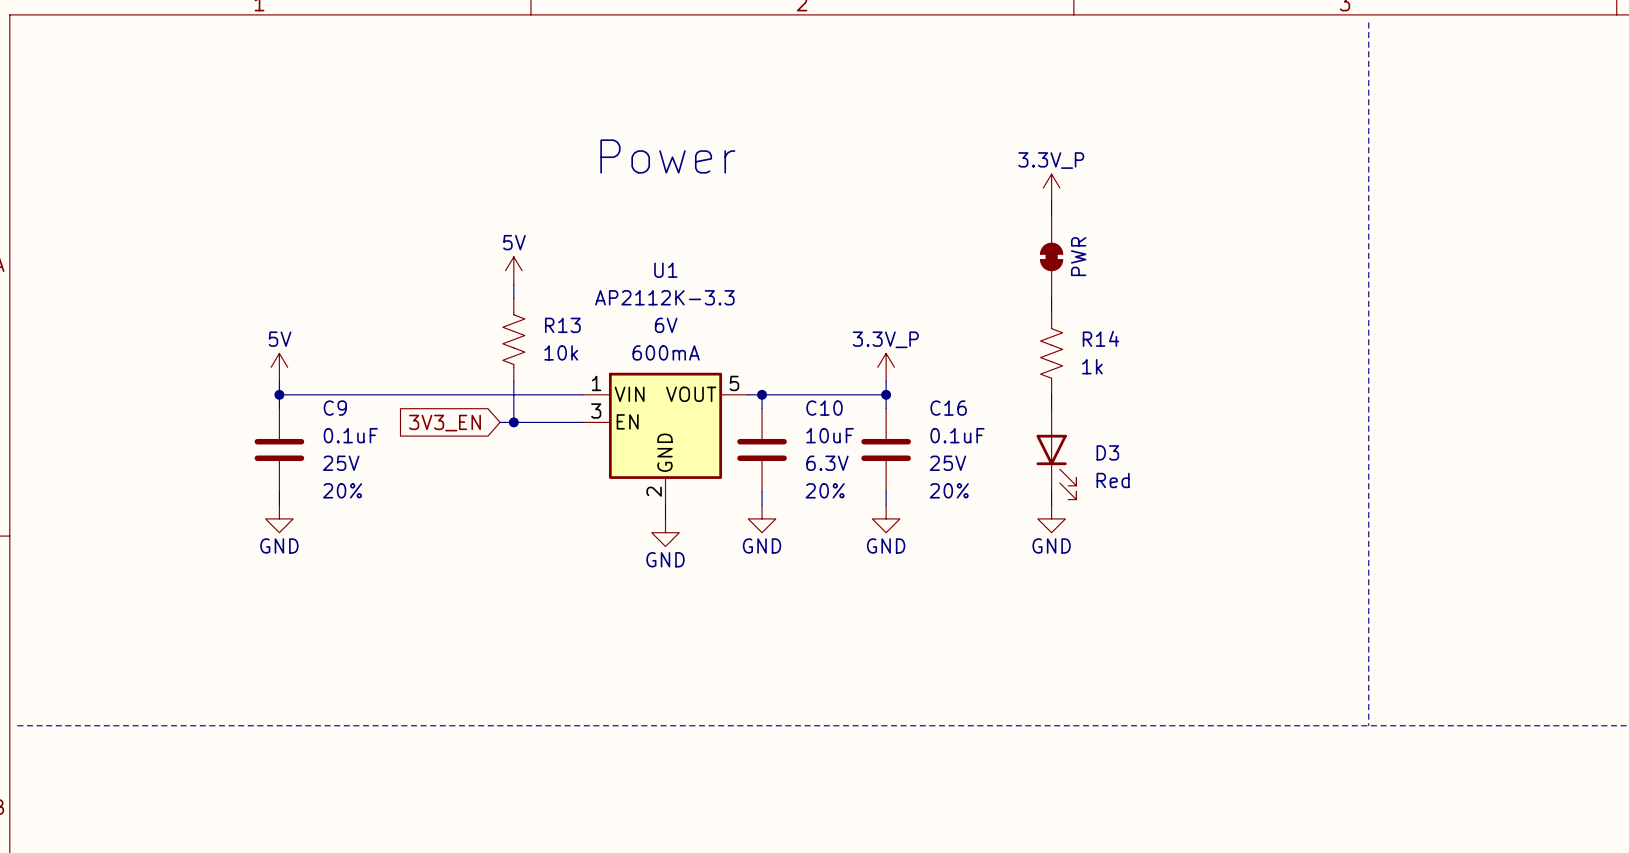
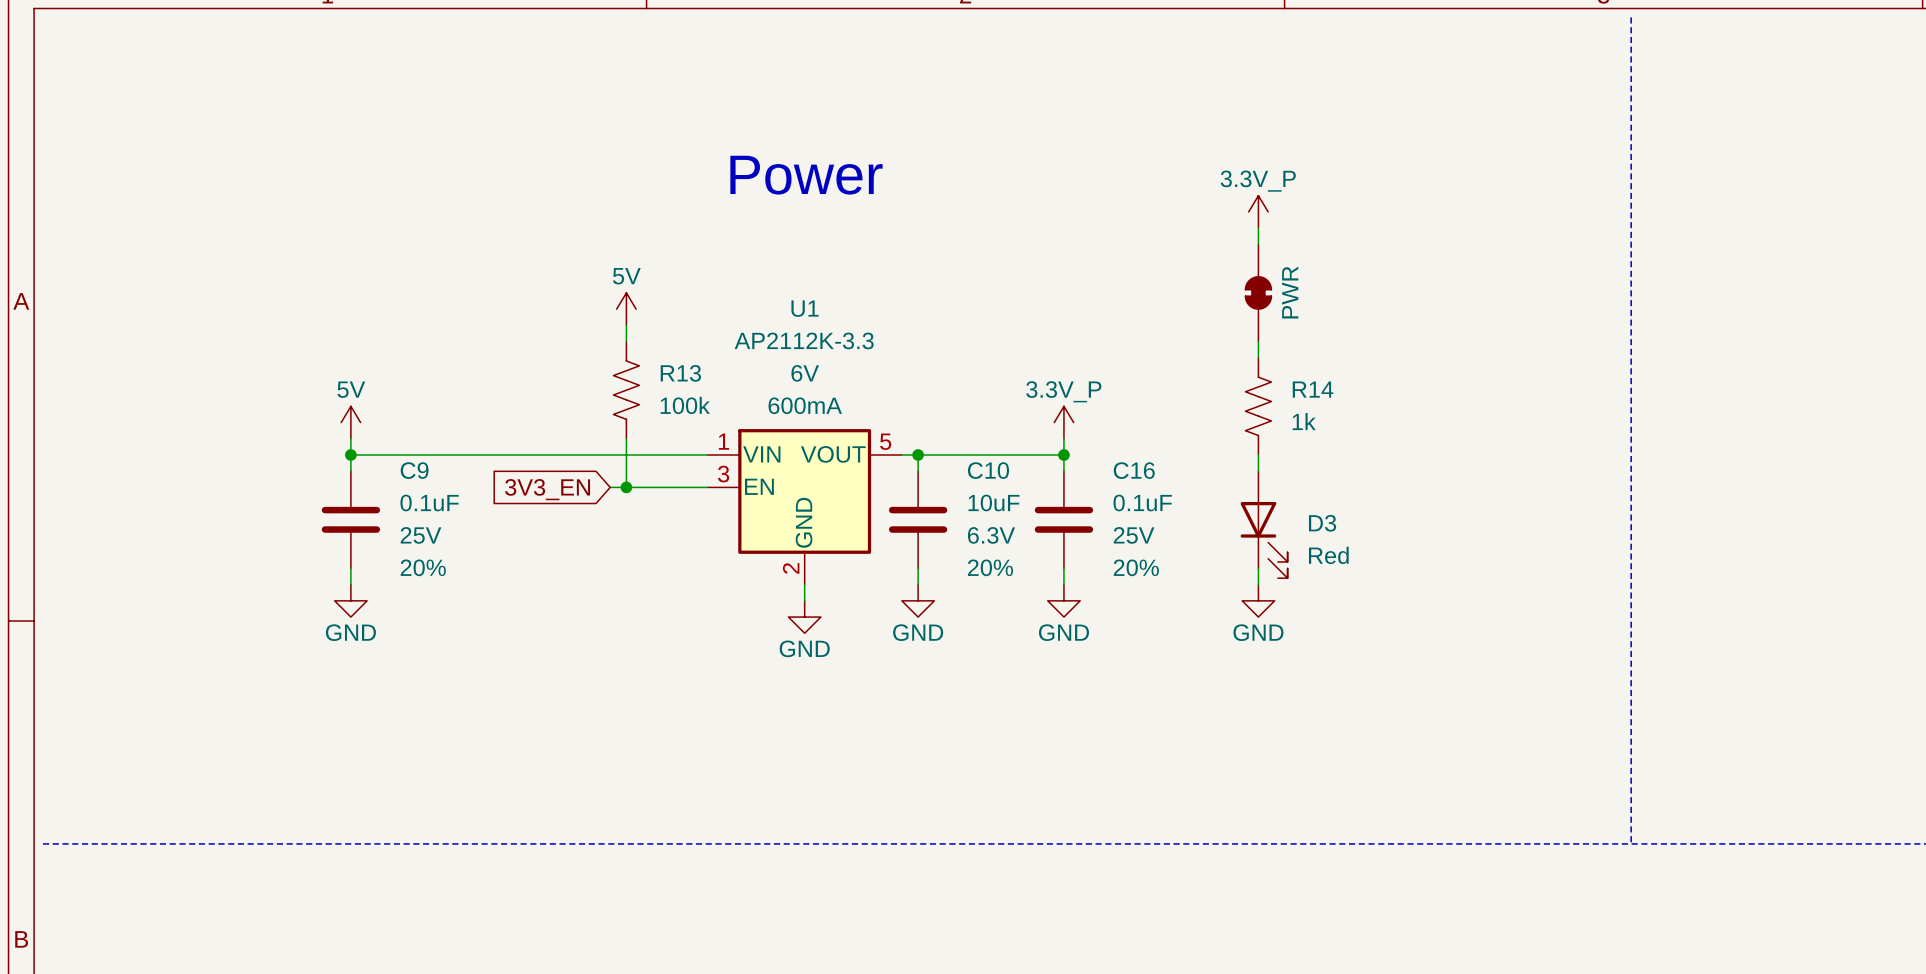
R13 value: 10k (561, 352) -> 100k (685, 405)

